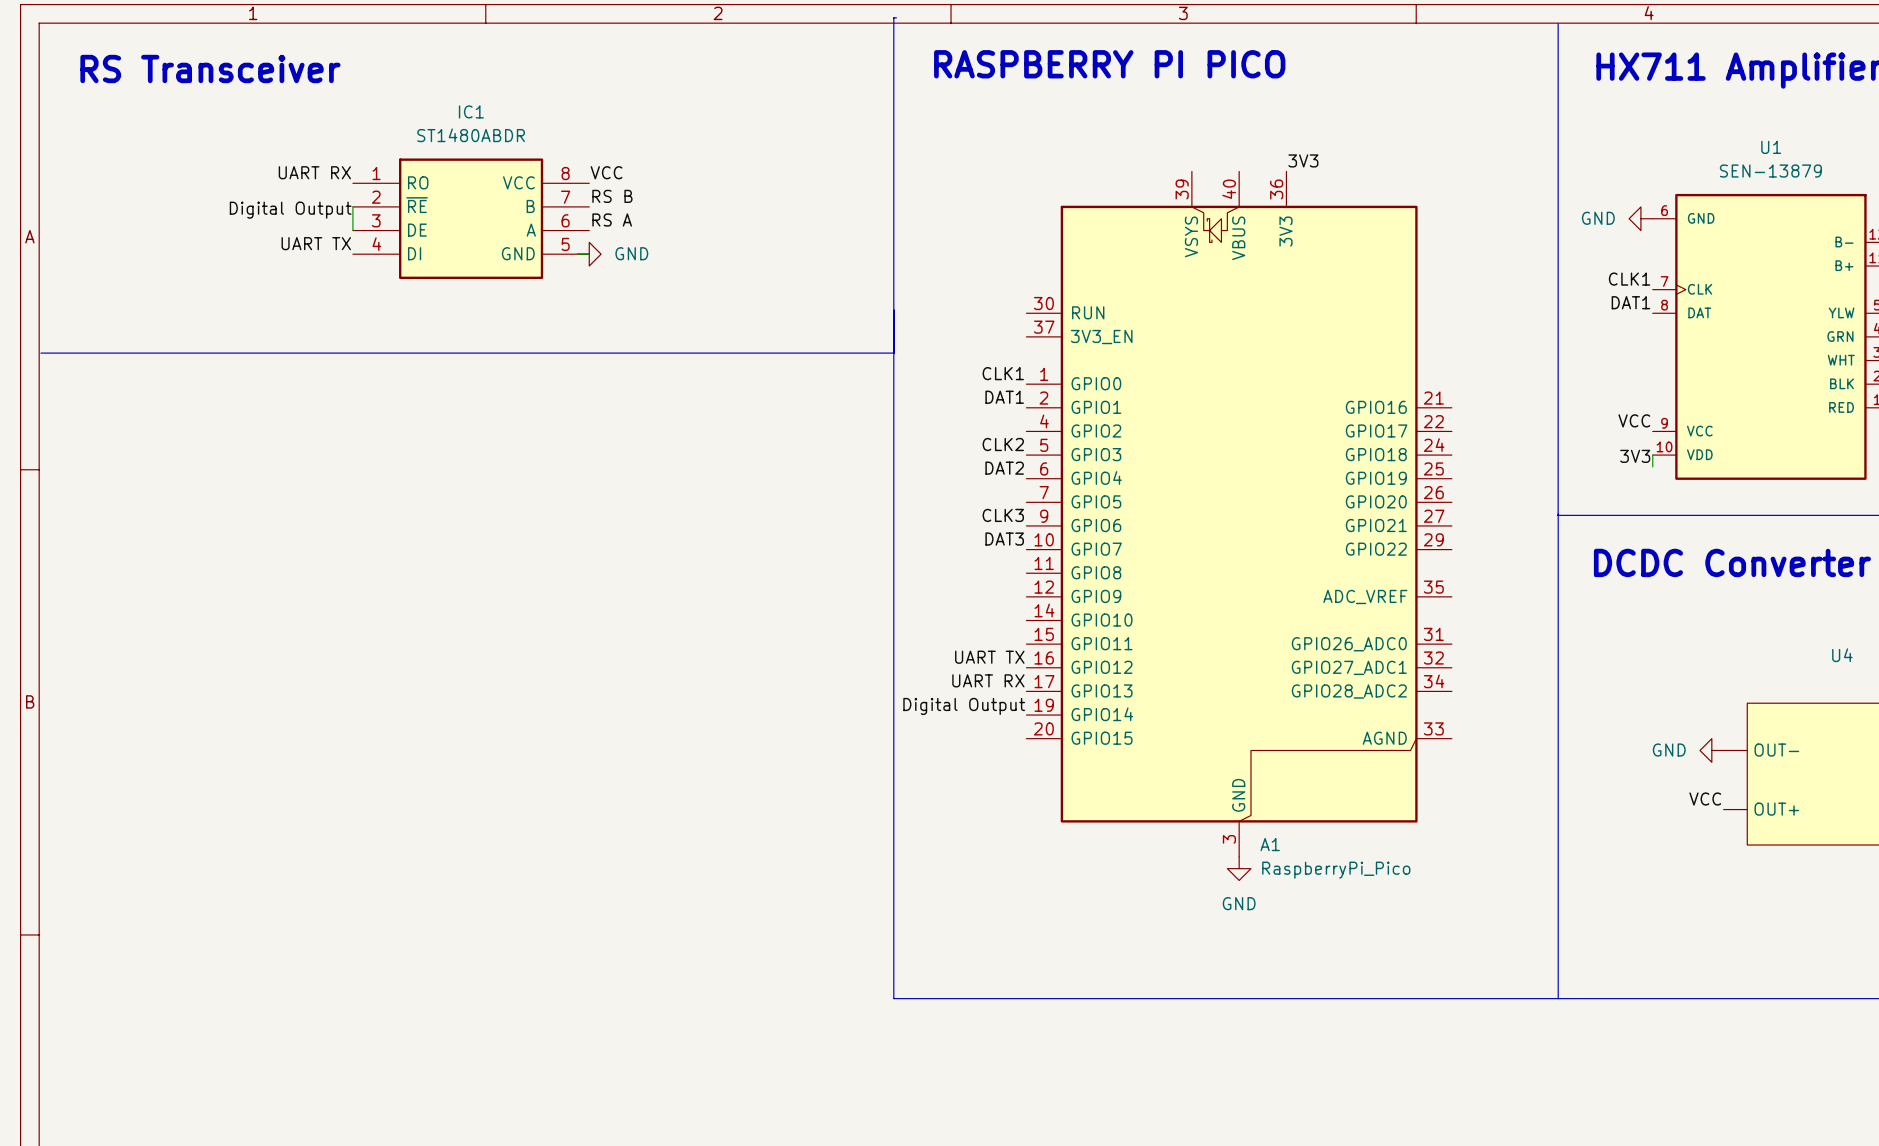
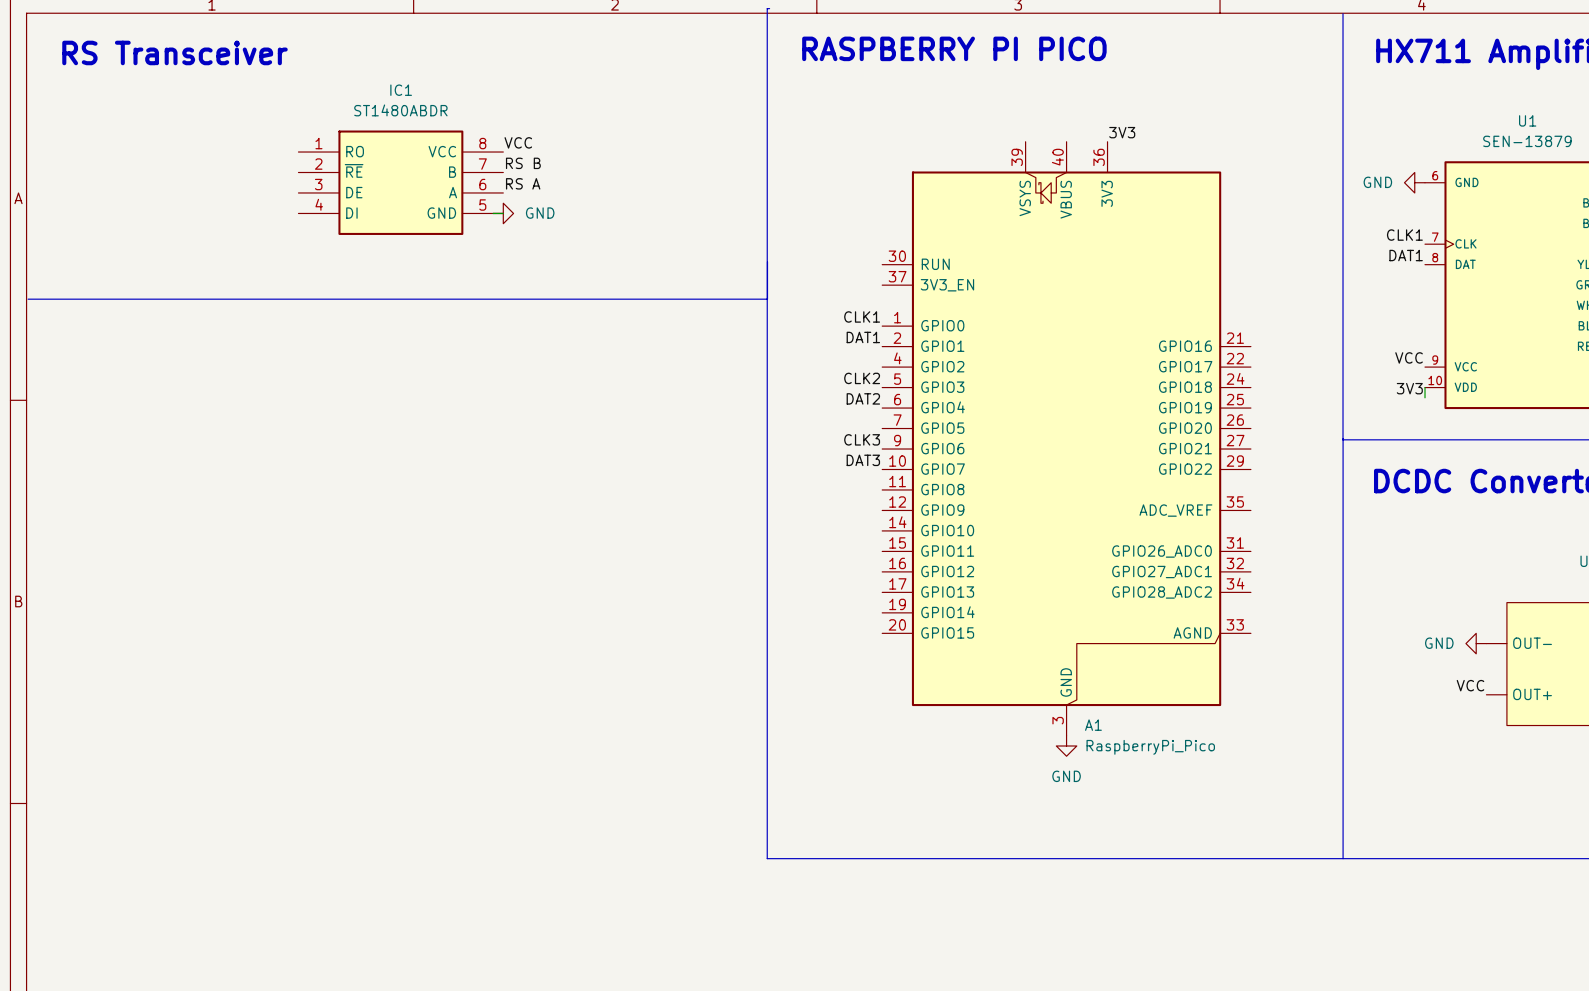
label: UART RX (314, 172) -> none
wire: (352, 206) (352, 230) -> none
label: Digital Output (290, 210) -> none
label: UART TX (316, 243) -> none
label: UART TX (989, 657) -> none
label: UART RX (988, 680) -> none
label: Digital Output (964, 706) -> none

